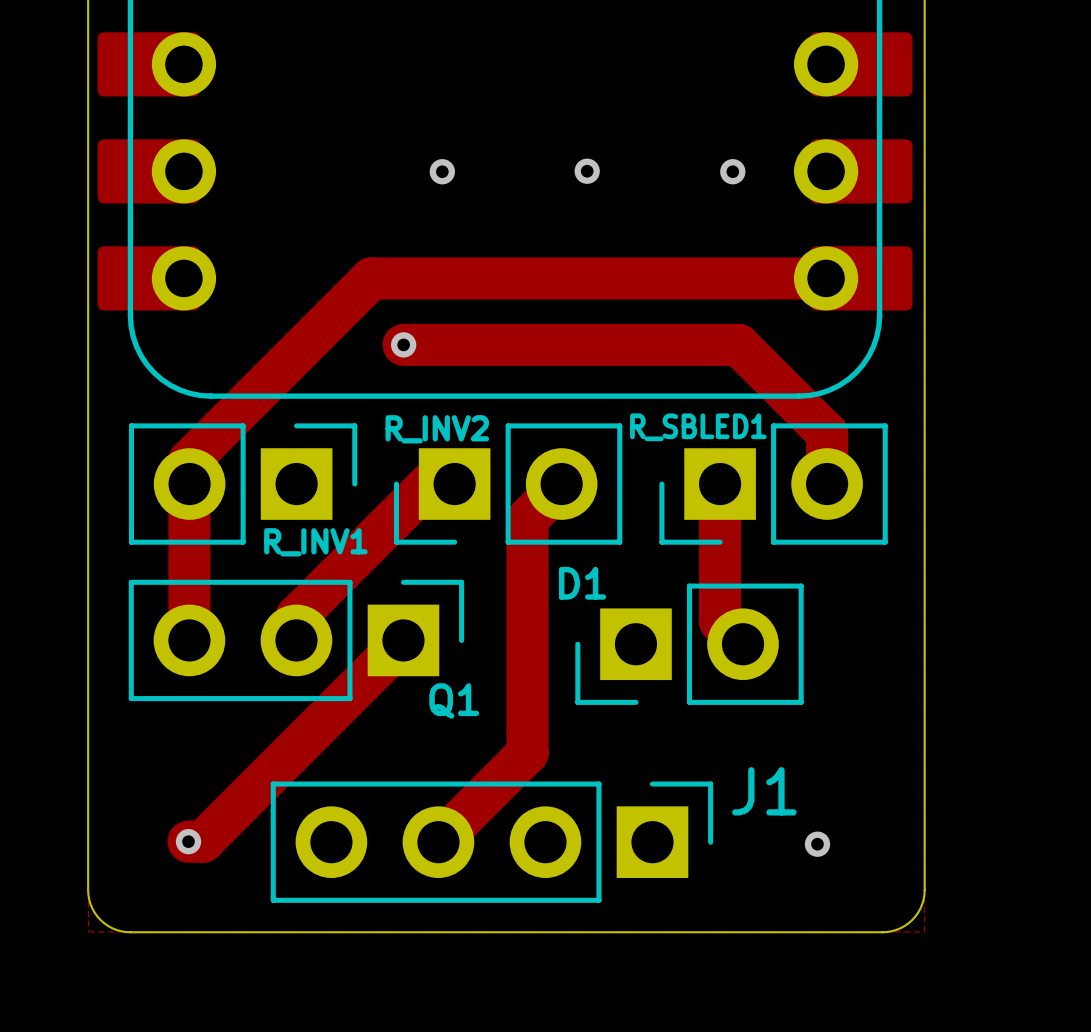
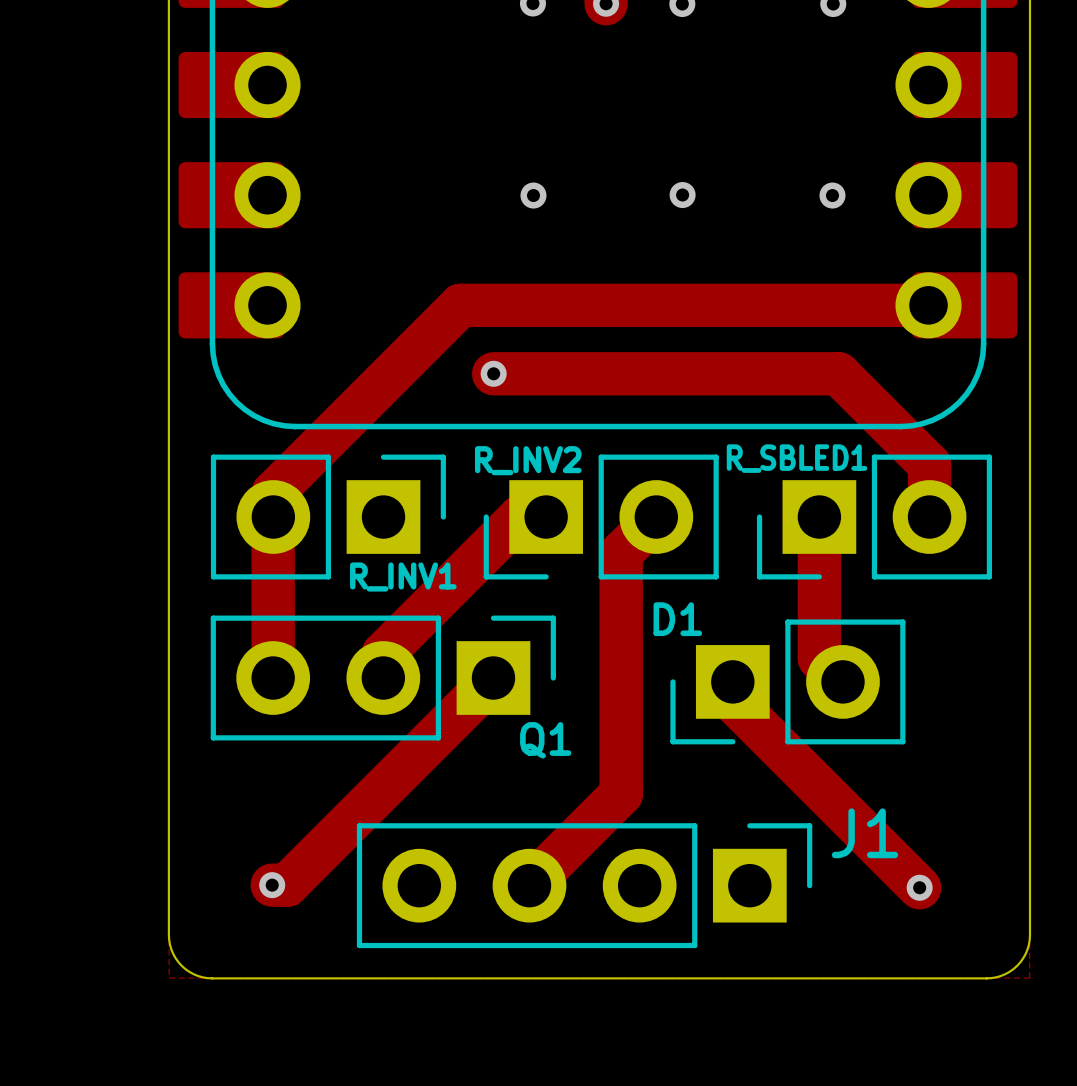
track: none -> (732, 681) (732, 700) (919, 887)

